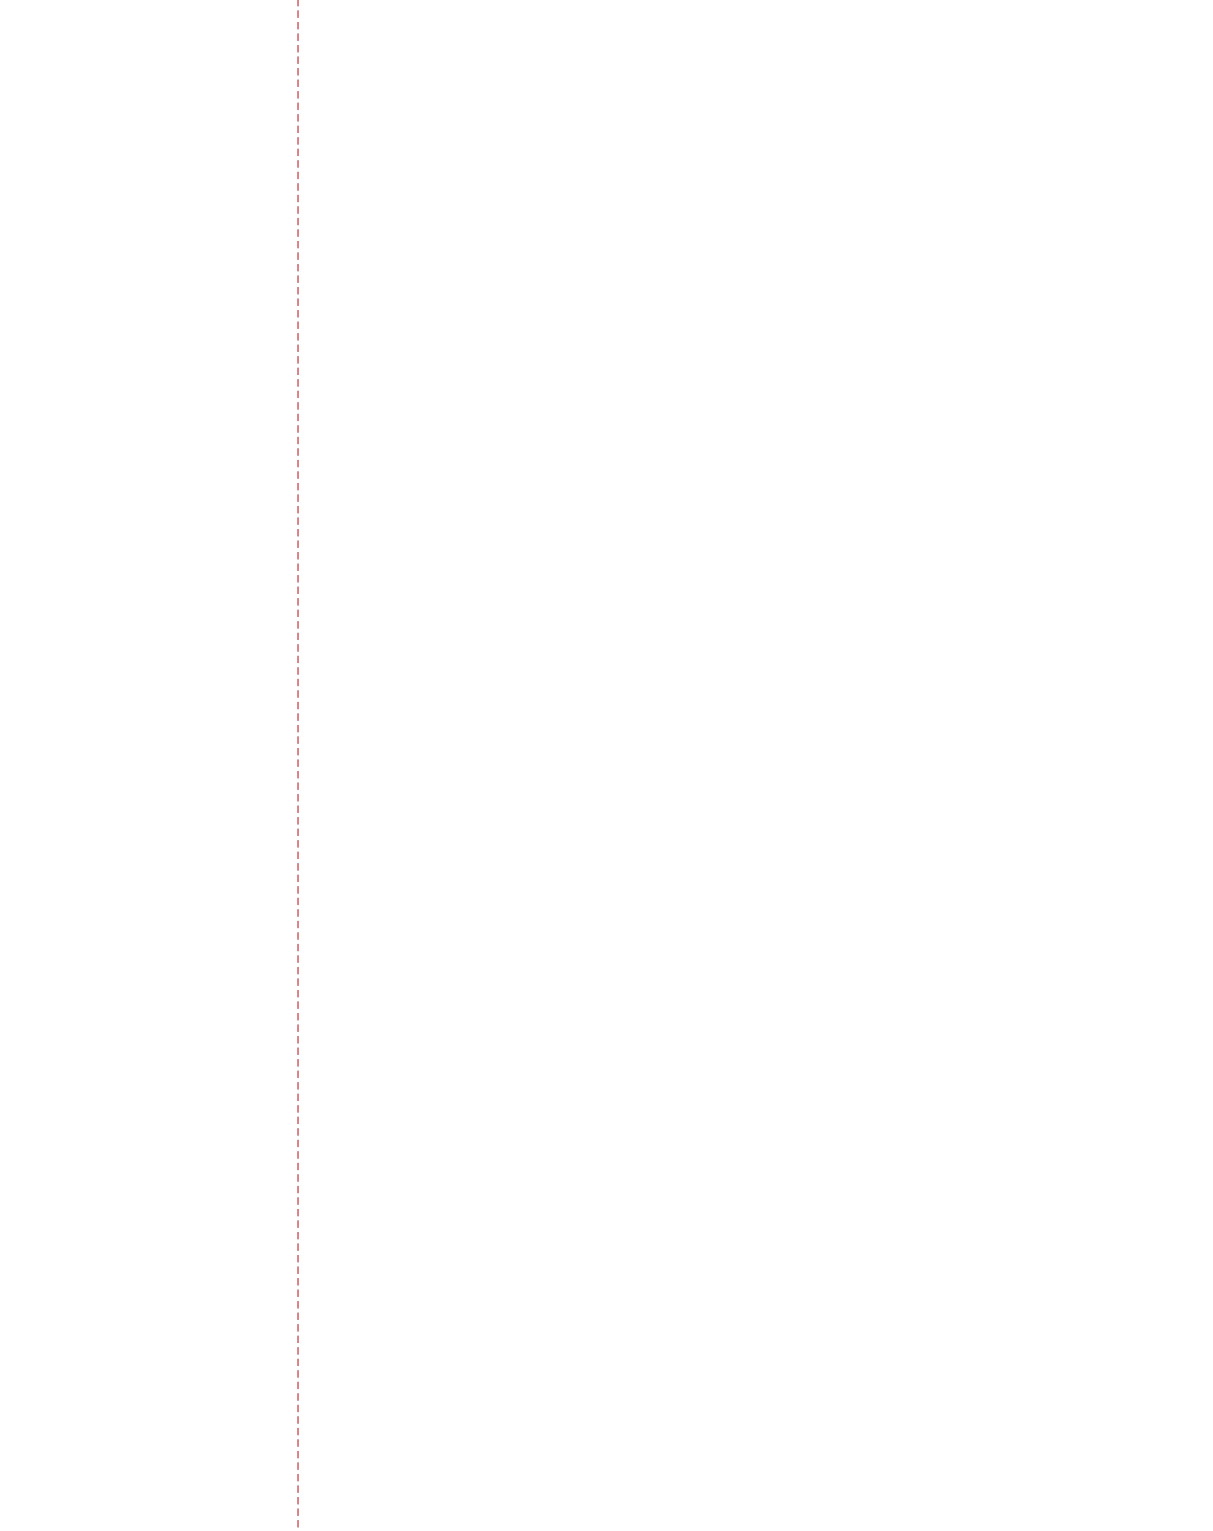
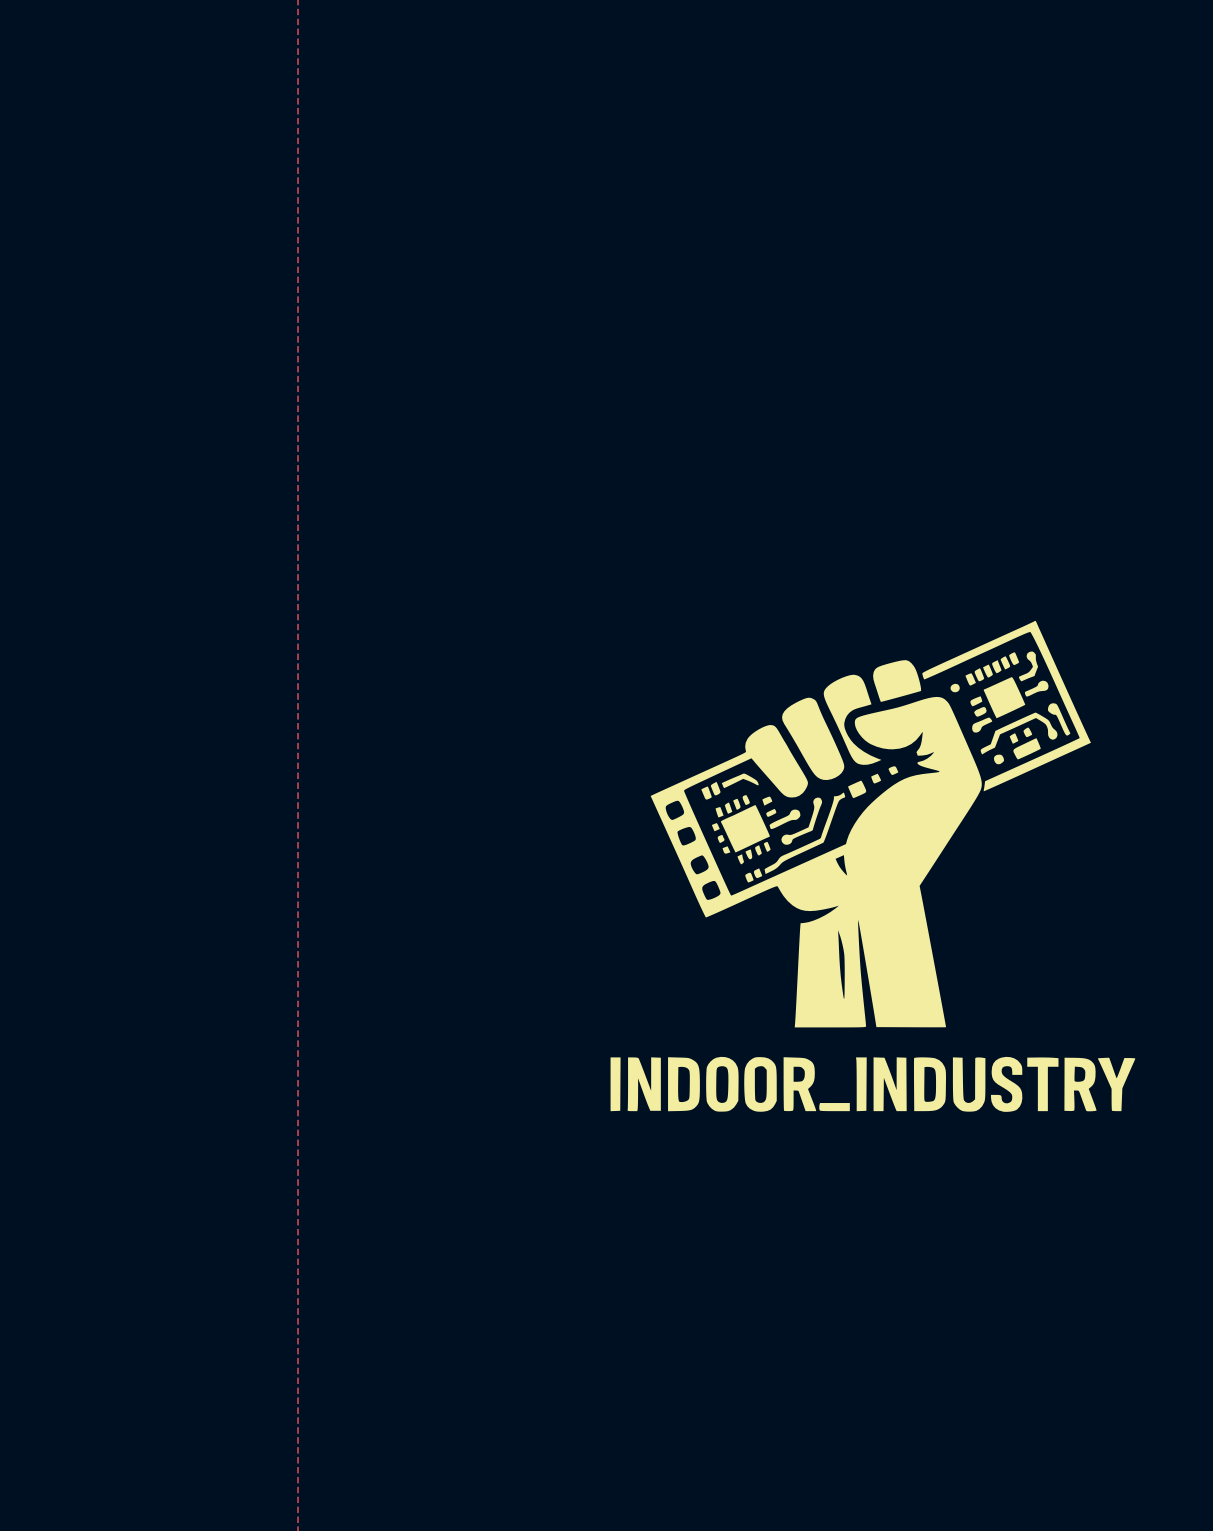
drawing: none -> [610, 620, 1136, 1112]

